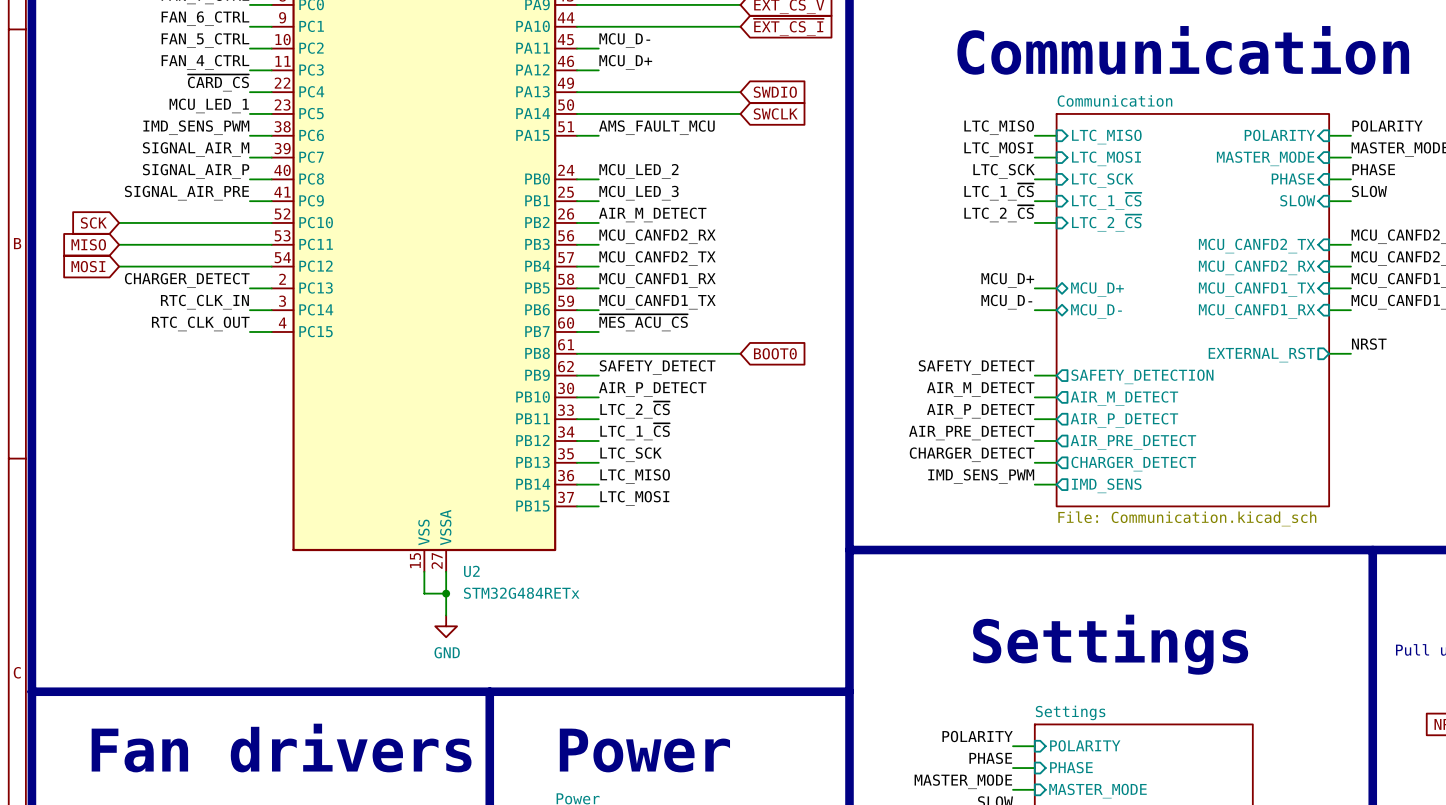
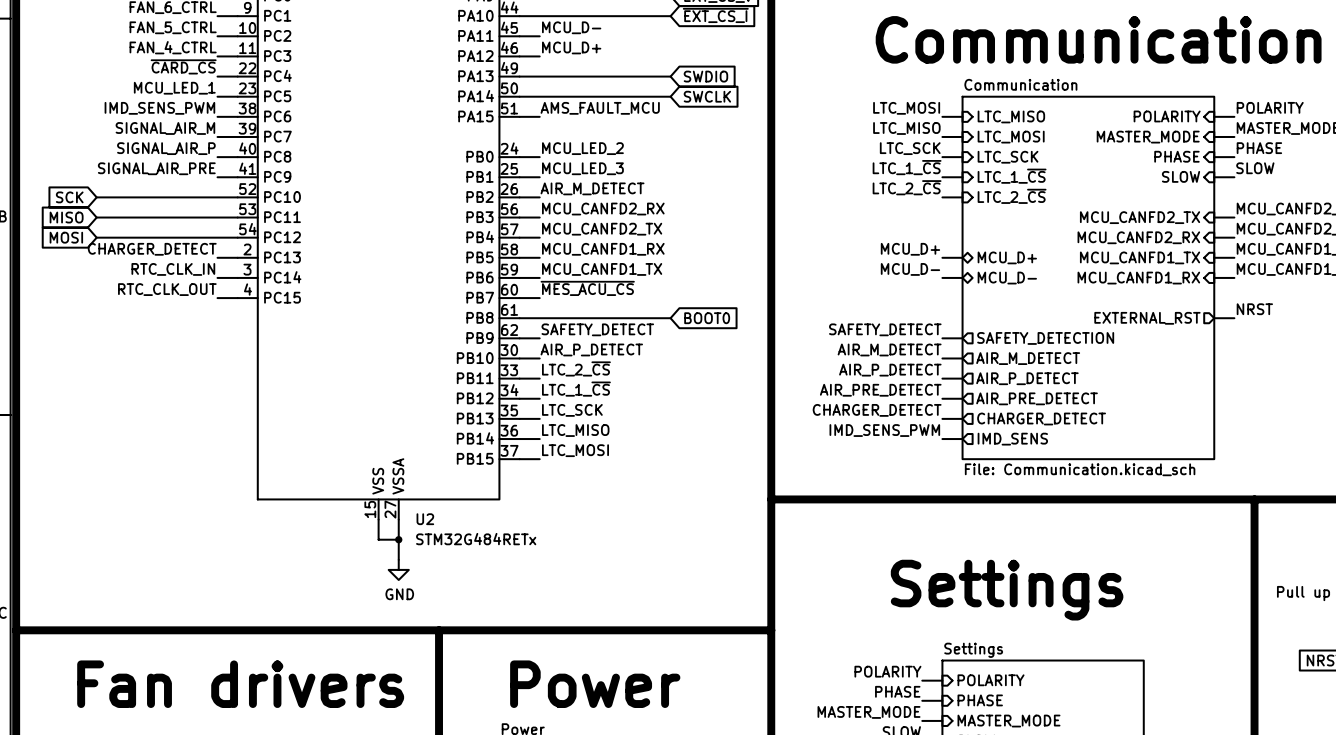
label: LTC_MISO (999, 127) -> LTC_MOSI (906, 108)
label: LTC_MOSI (998, 149) -> LTC_MISO (906, 128)

